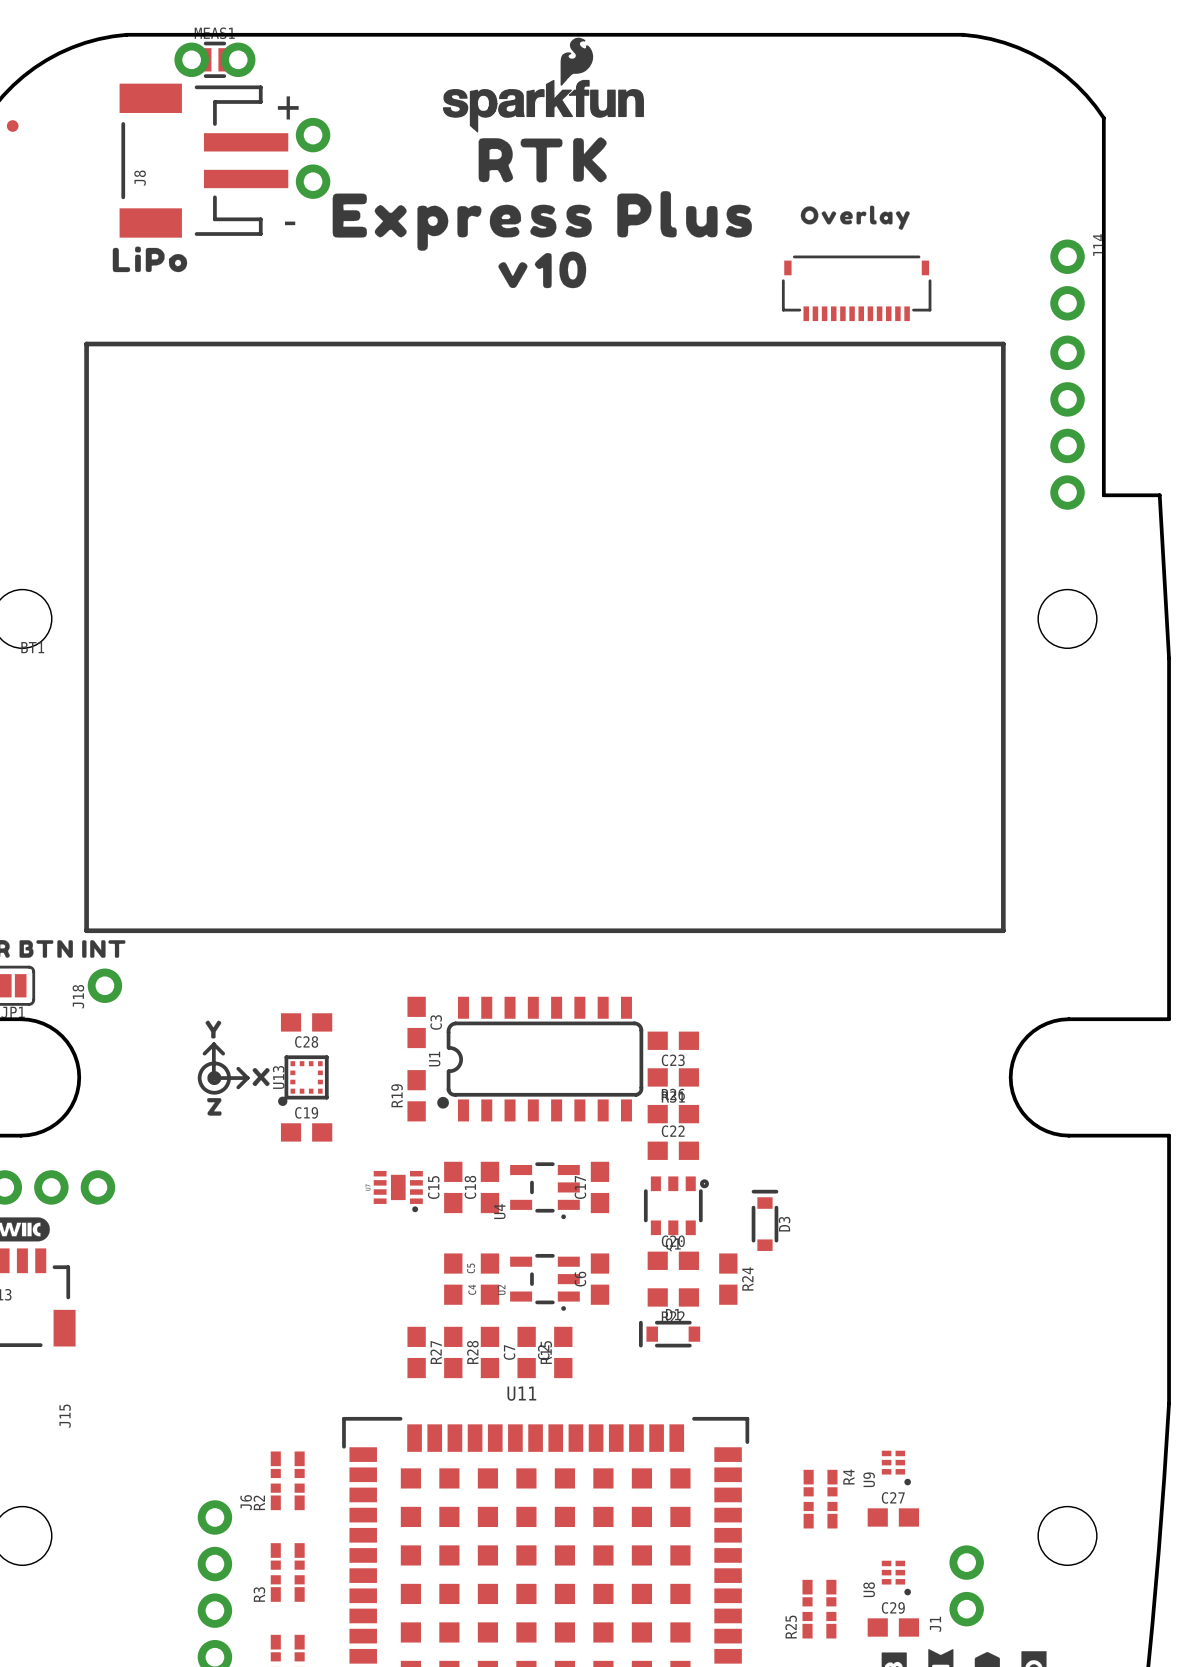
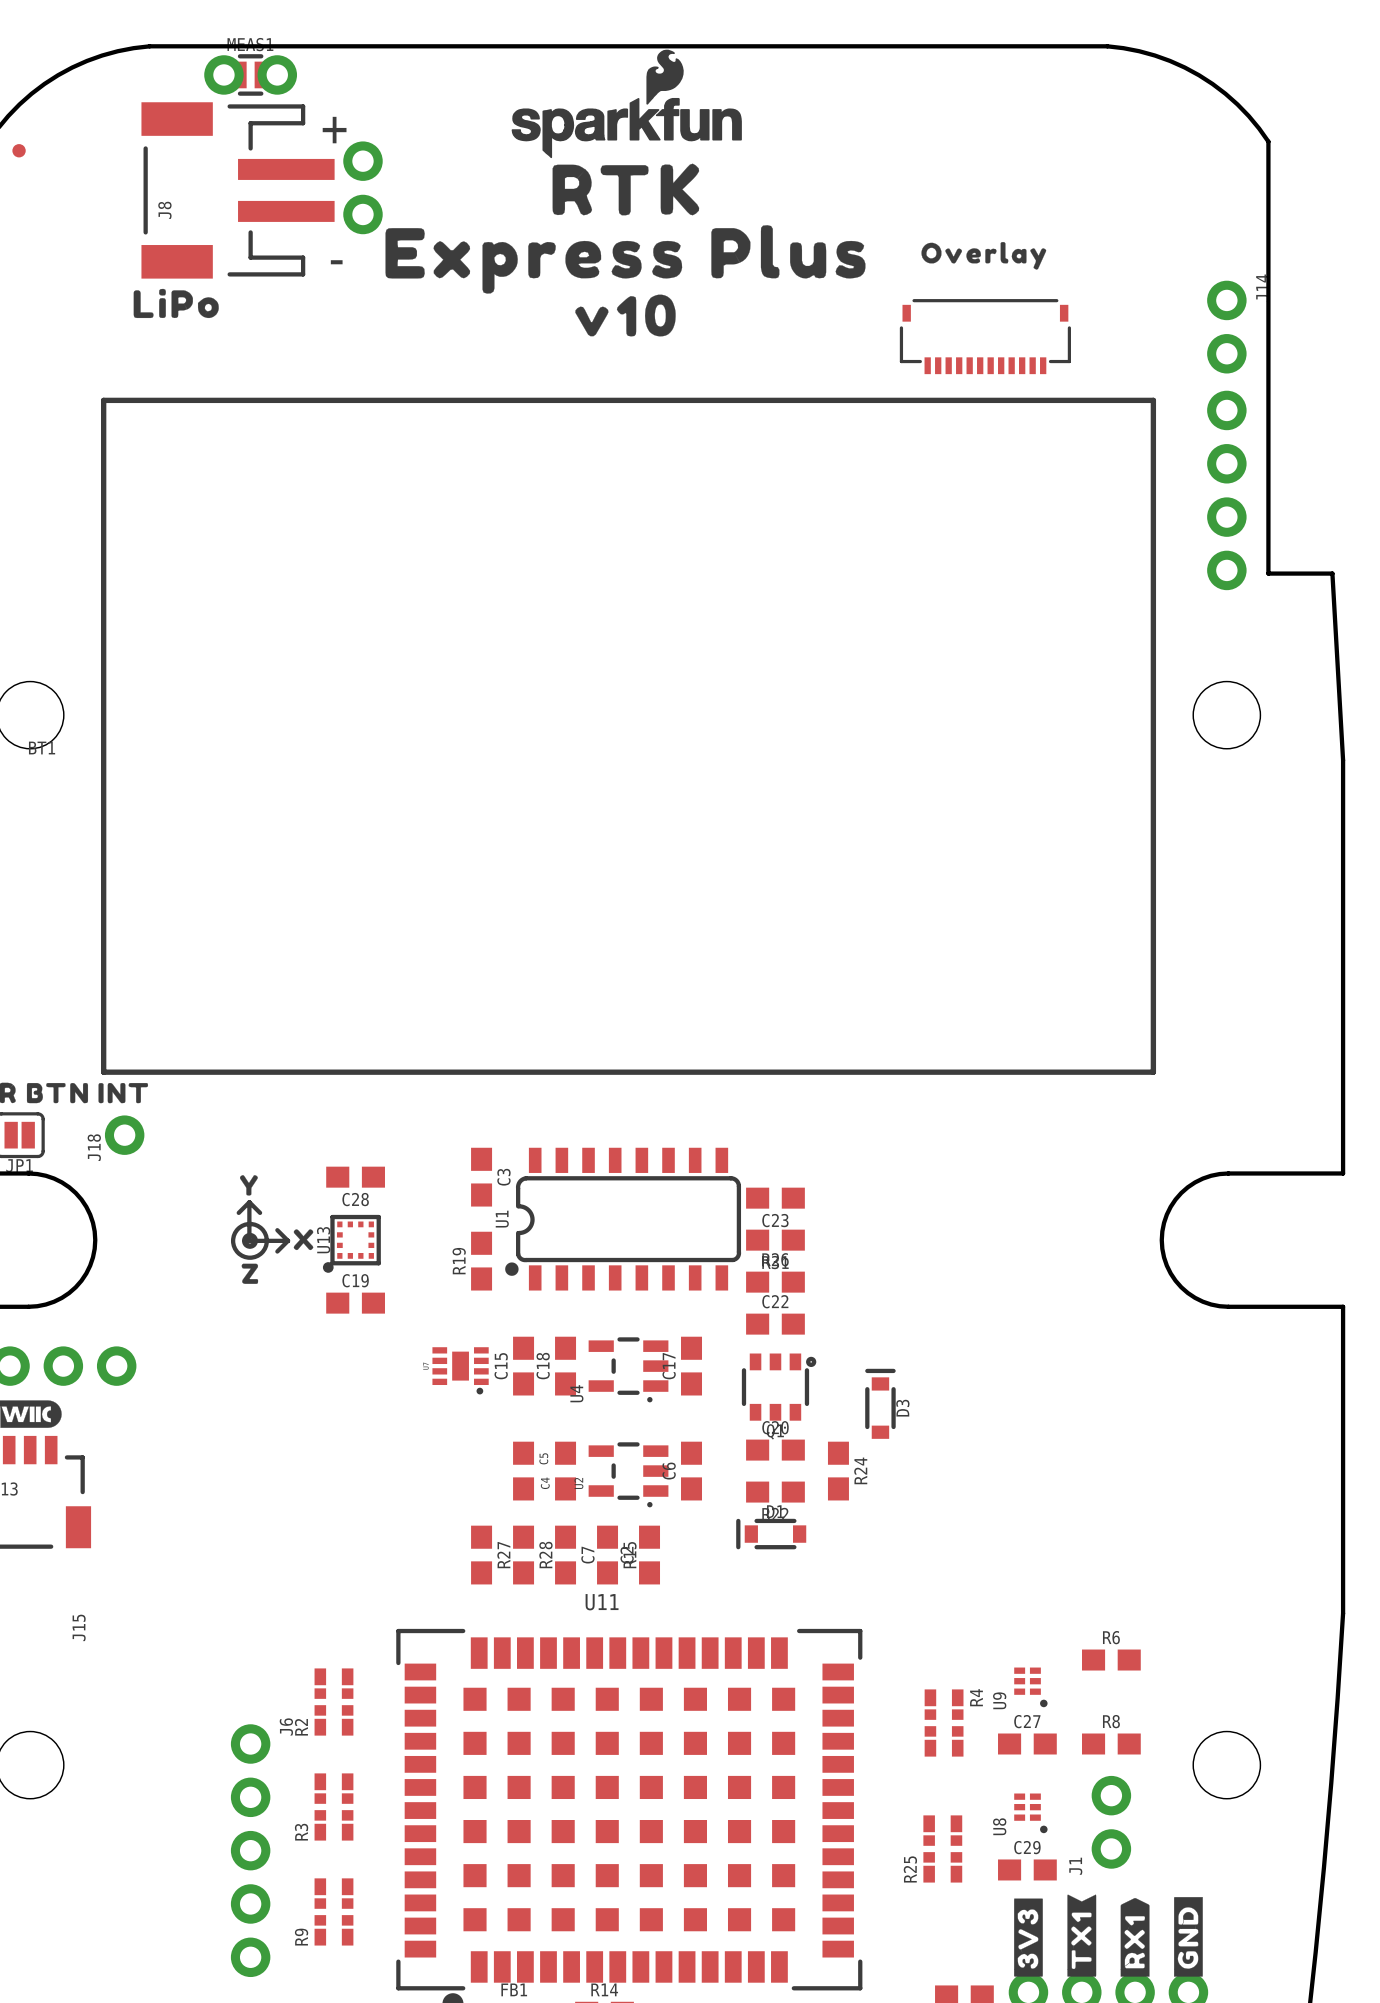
R6: none -> (1111, 1660)
R8: none -> (1111, 1744)

